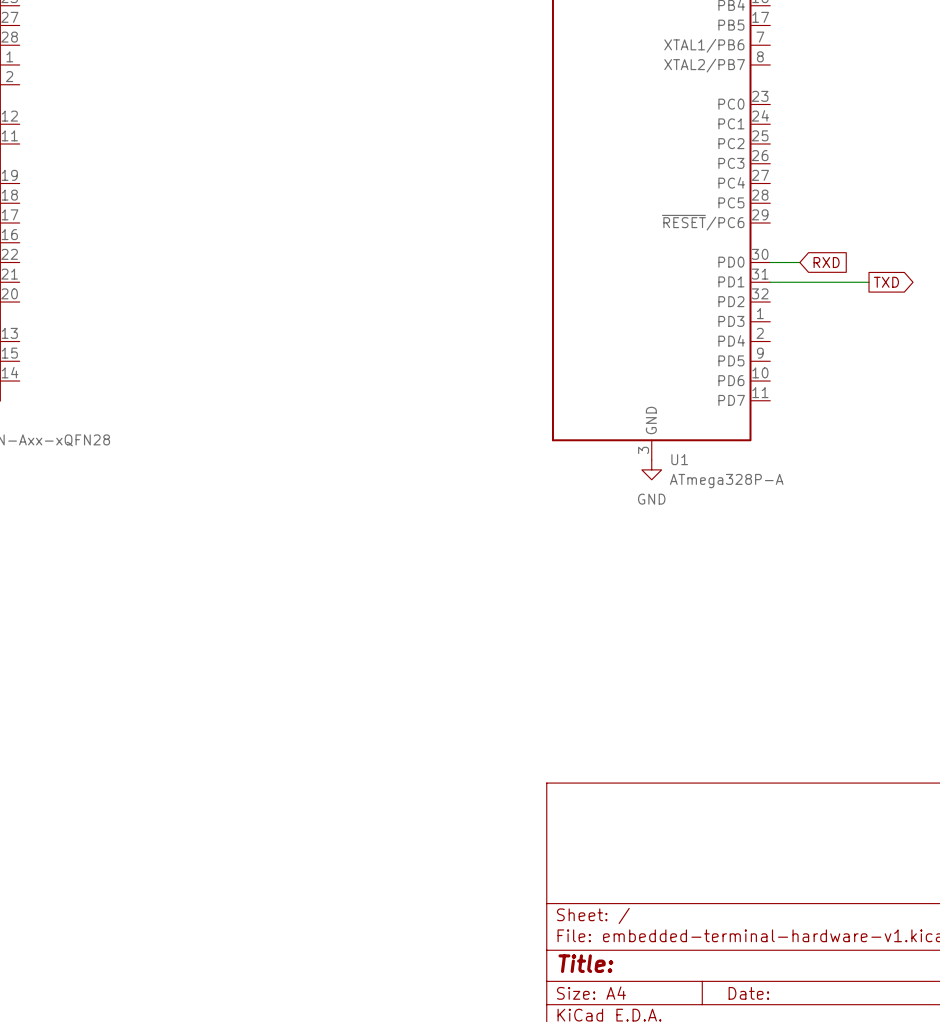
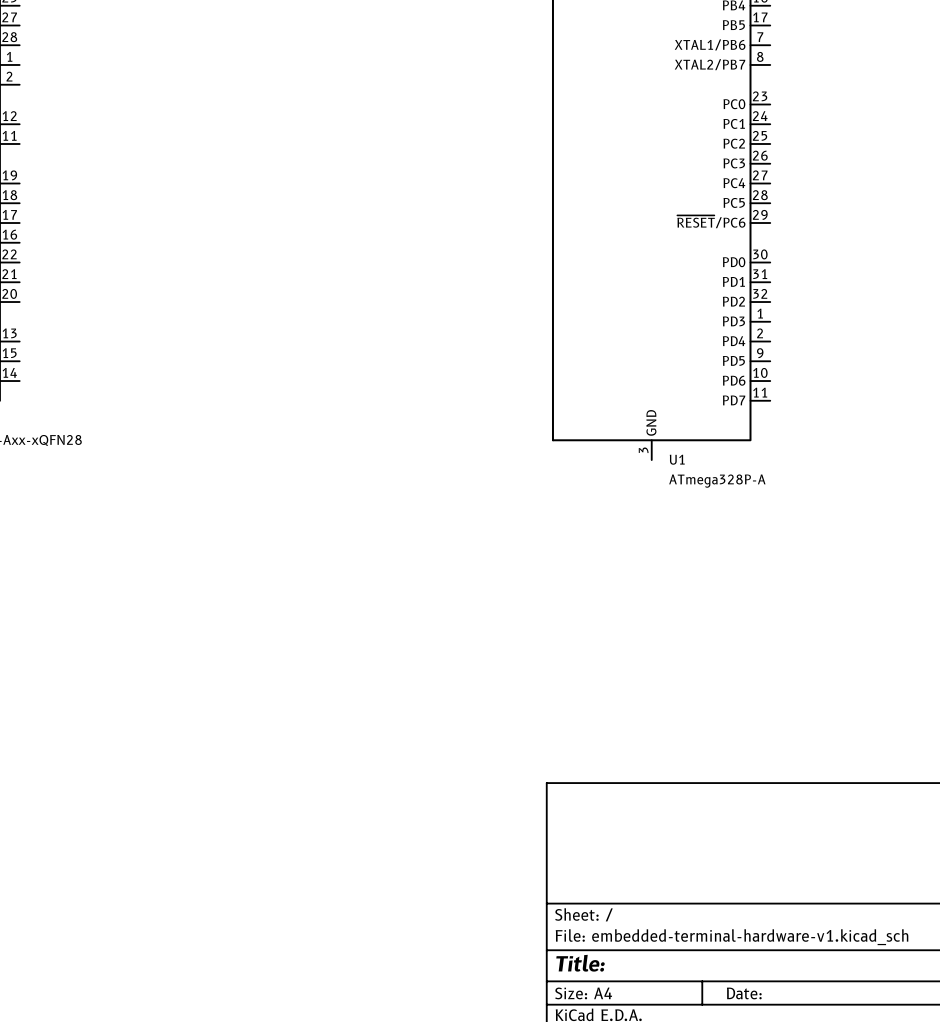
wire: (770, 262) (799, 262) -> none
global label: RXD (826, 262) -> none
wire: (770, 282) (869, 282) -> none
global label: TXD (886, 282) -> none
power symbol: GND (651, 469) -> none

